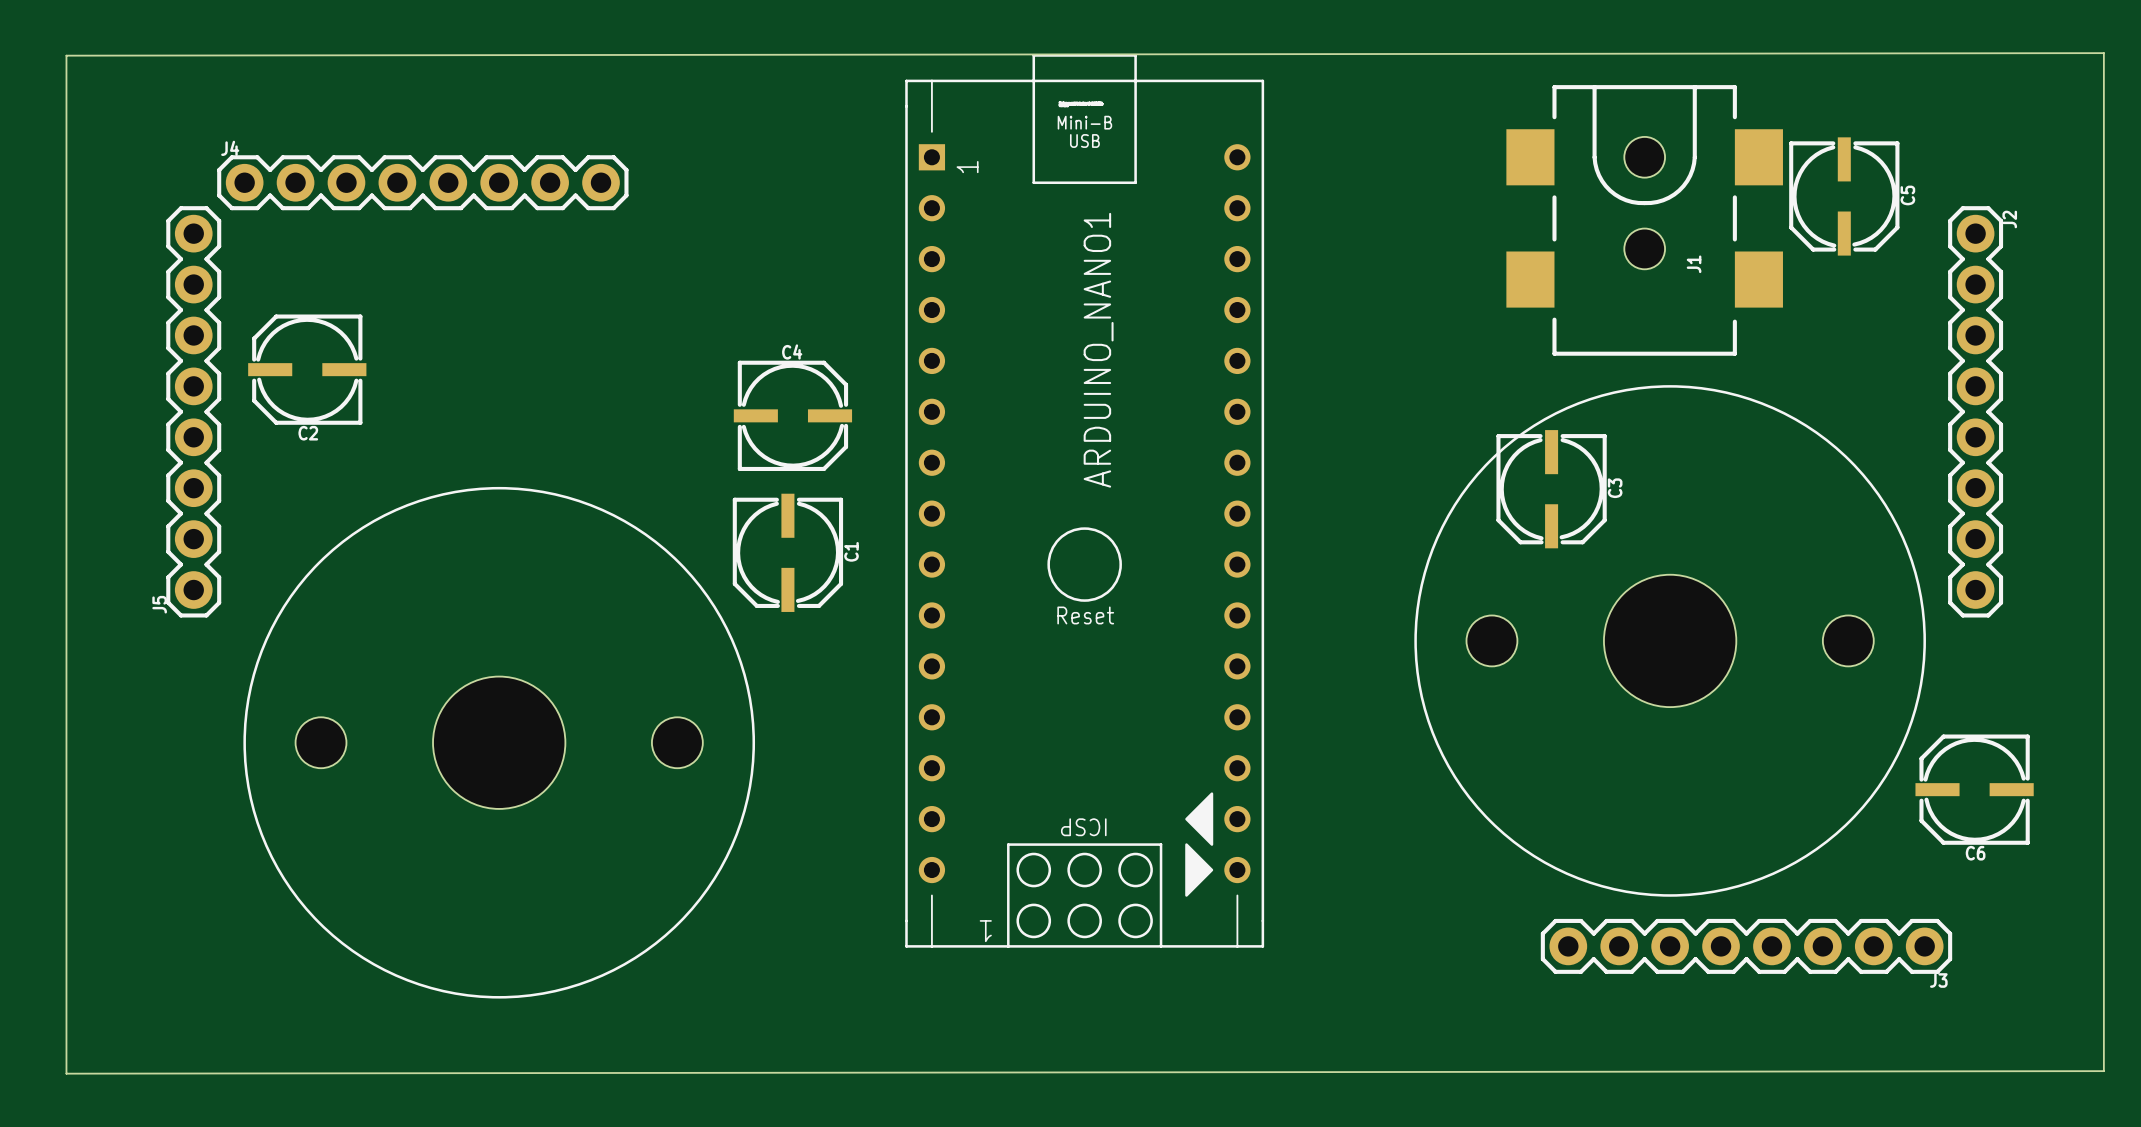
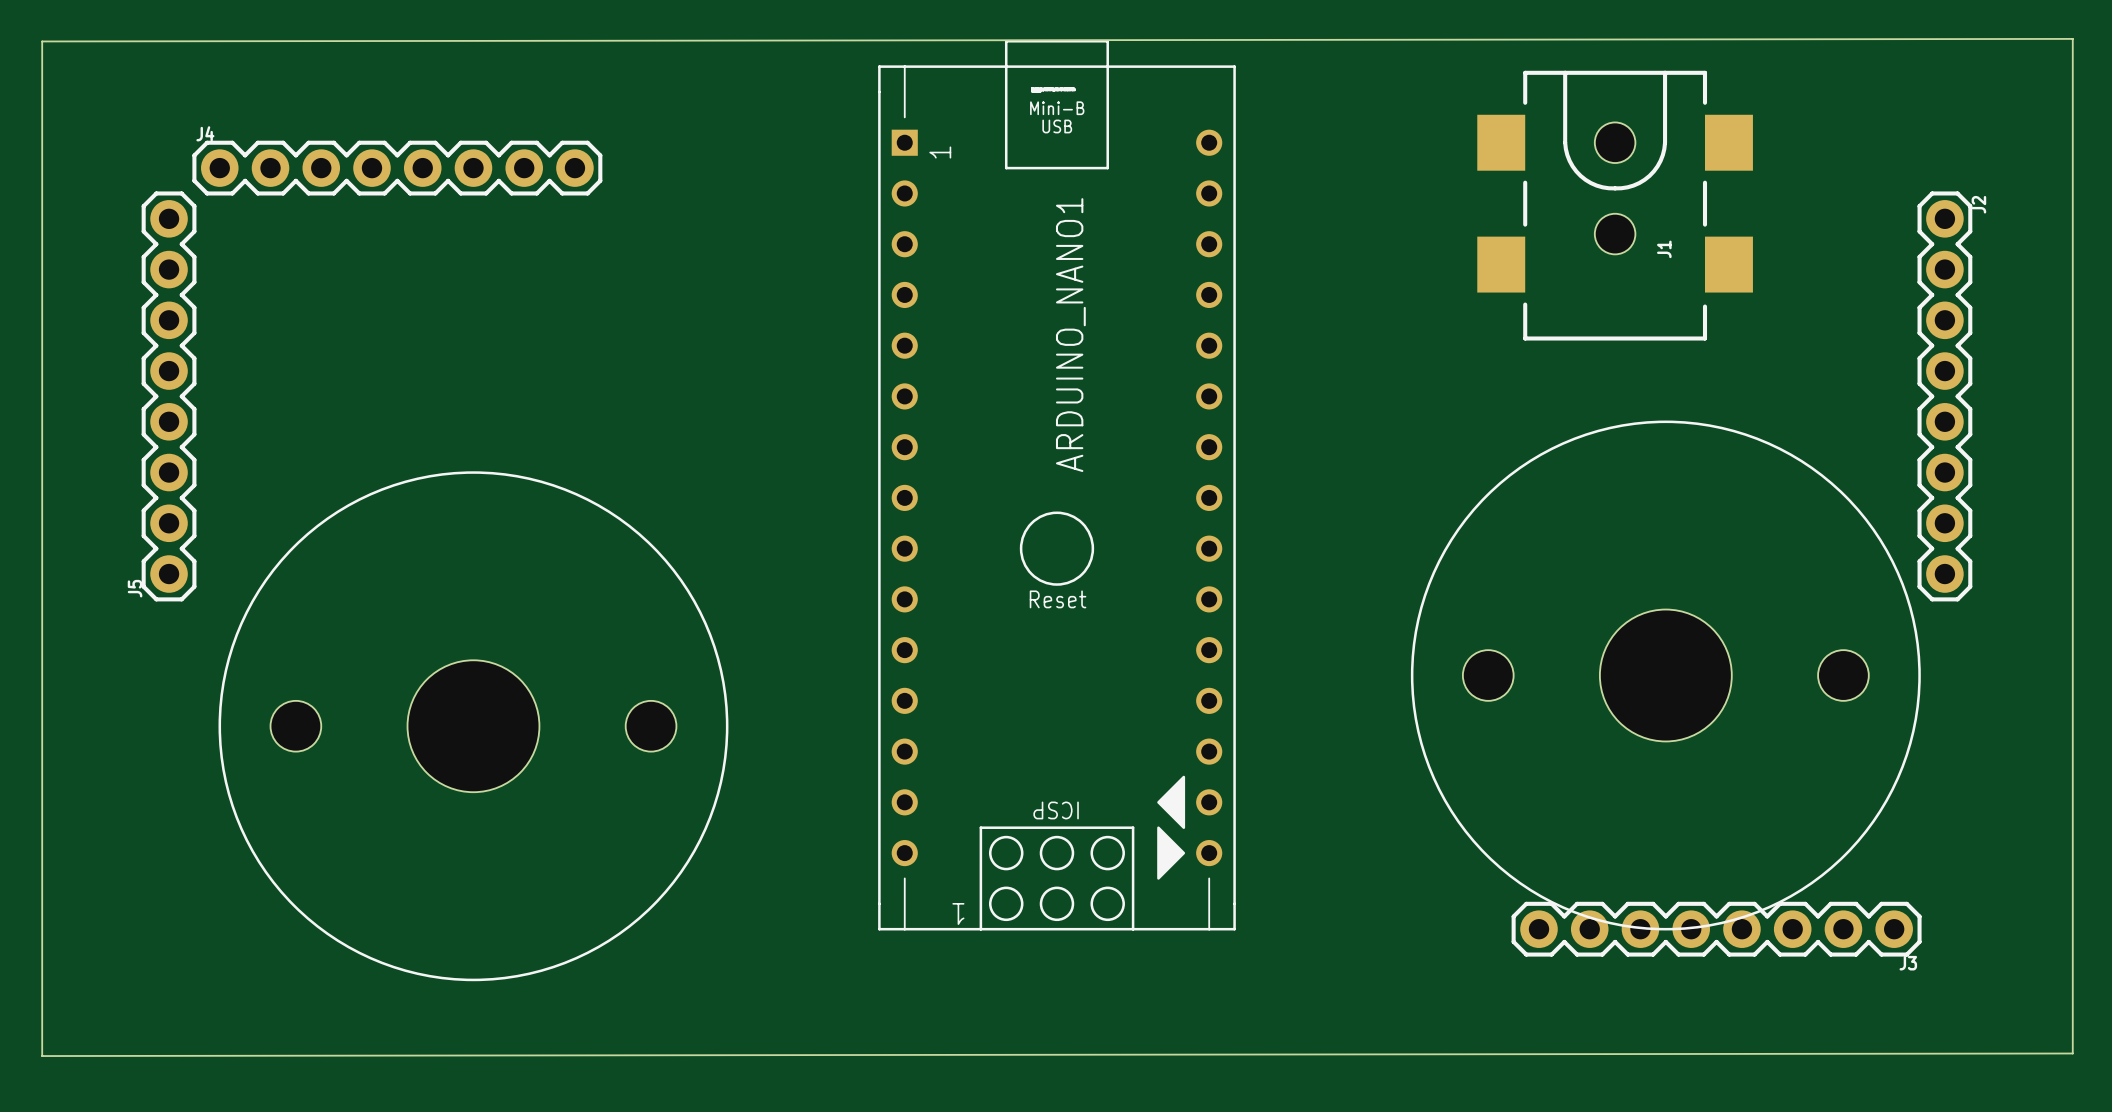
C5: (1844, 196) -> none
C2: (307, 369) -> none
C4: (792, 415) -> none
C3: (1551, 489) -> none
C1: (787, 552) -> none
part position: (1670, 640) -> (1665, 675)
C6: (1974, 789) -> none

